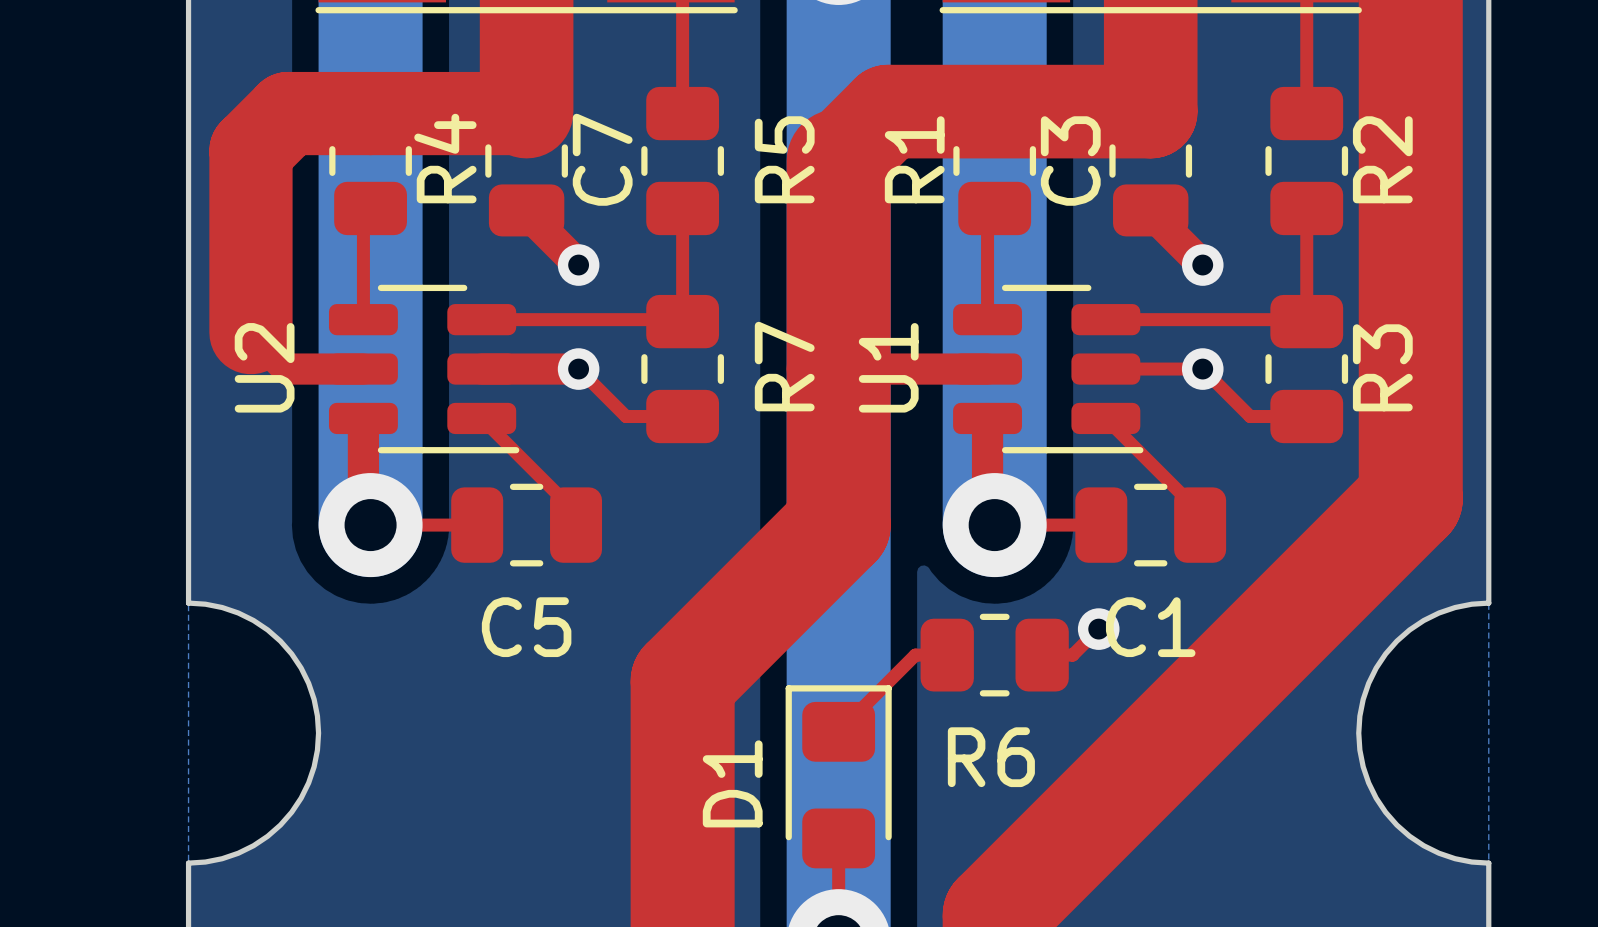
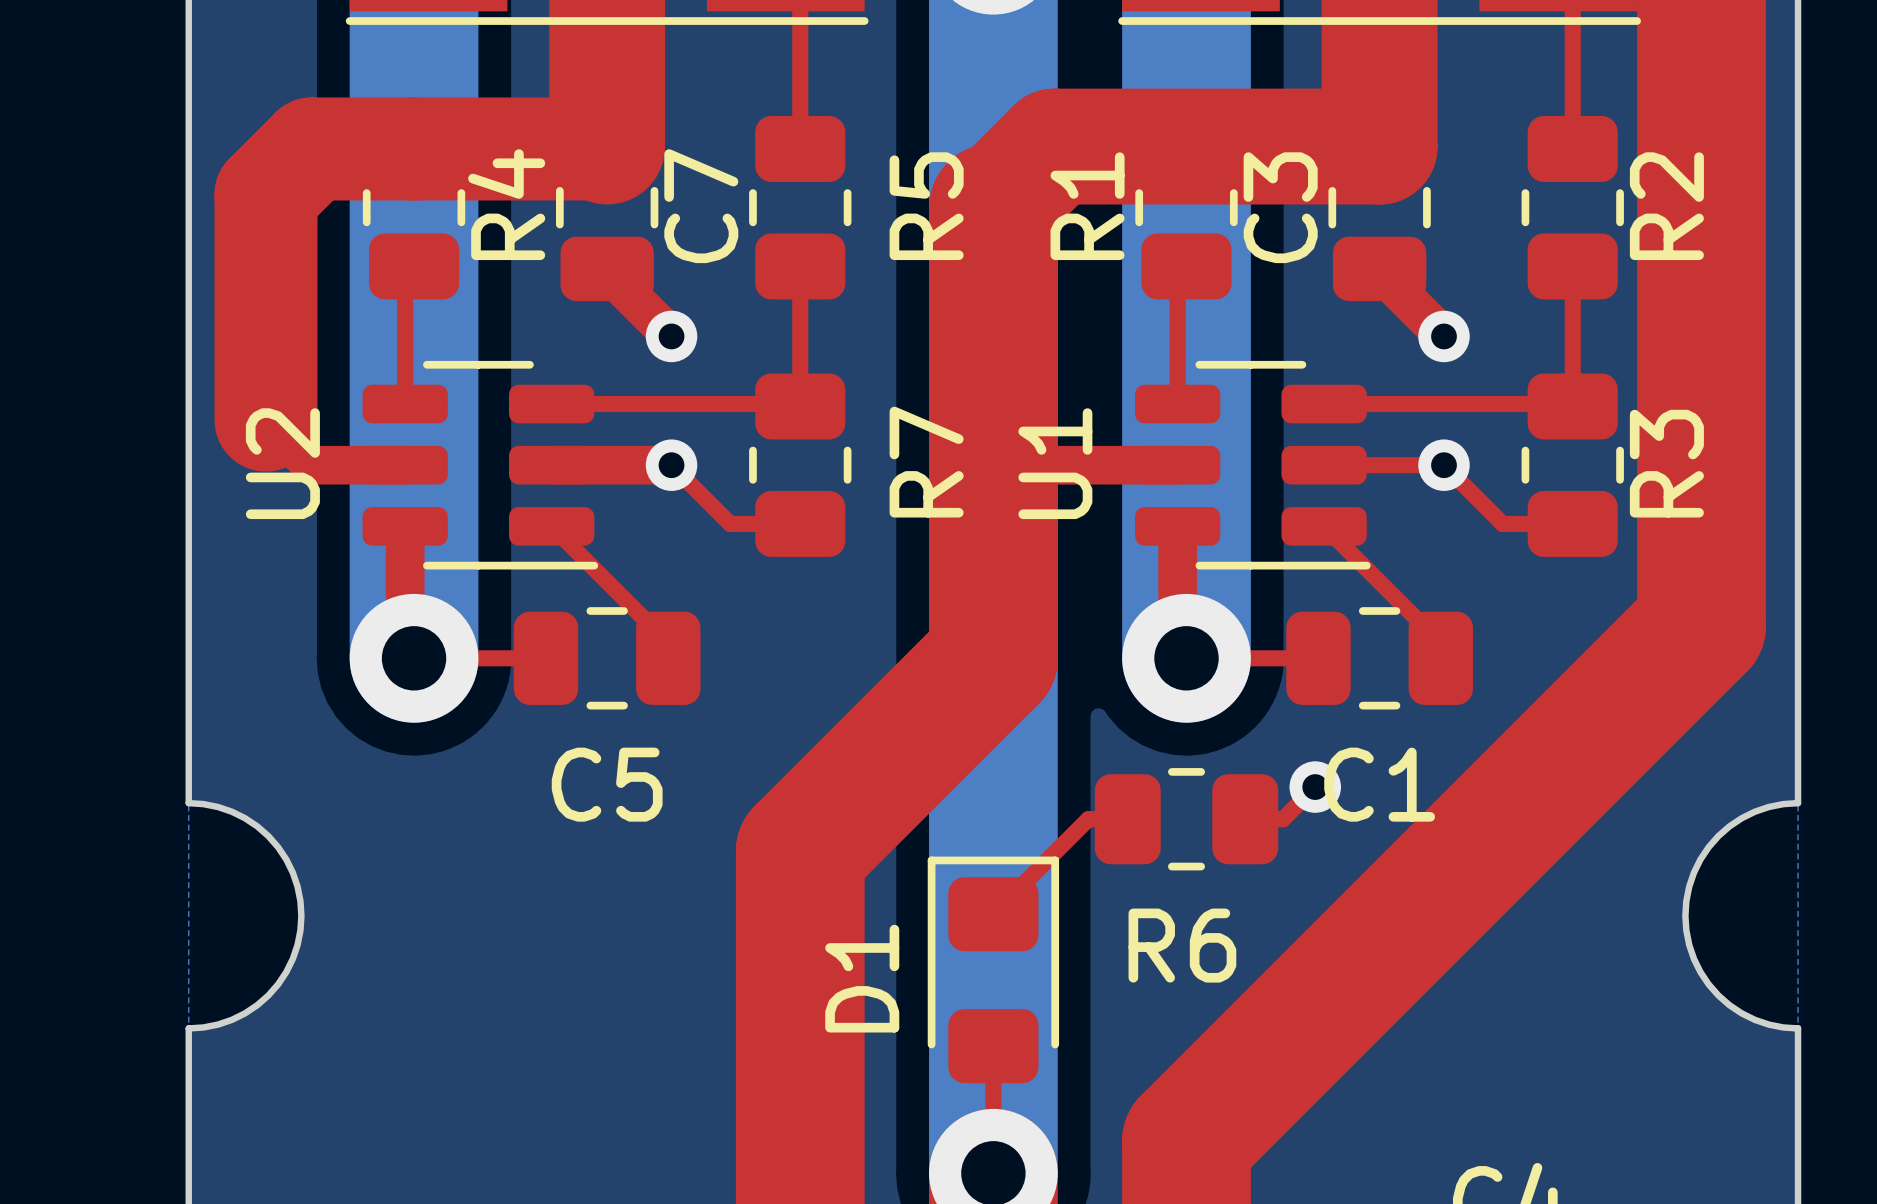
board edge: (188, 603) (205, 604) (238, 612) (267, 629) (280, 641) (291, 653) (308, 683) (317, 716) (318, 733) (317, 750) (308, 782) (291, 812) (280, 825) (267, 836) (238, 853) (205, 862) (188, 863) -> (188, 754) (188, 803) (217, 806) (231, 811) (257, 826) (268, 836) (278, 847) (292, 872) (297, 886) (301, 915) (297, 944) (292, 958) (278, 984) (268, 995) (257, 1005) (231, 1019) (217, 1024) (188, 1028) (188, 1076)
board edge: (1488, 603) (1471, 604) (1439, 612) (1409, 629) (1396, 641) (1385, 653) (1368, 683) (1359, 716) (1358, 733) (1359, 750) (1368, 782) (1385, 812) (1396, 825) (1409, 836) (1439, 853) (1471, 862) (1488, 863) -> (1798, 754) (1798, 803) (1768, 806) (1754, 811) (1729, 826) (1718, 836) (1708, 847) (1693, 872) (1689, 886) (1685, 915) (1689, 944) (1693, 958) (1708, 984) (1718, 995) (1729, 1005) (1754, 1019) (1768, 1024) (1798, 1028) (1798, 1076)

